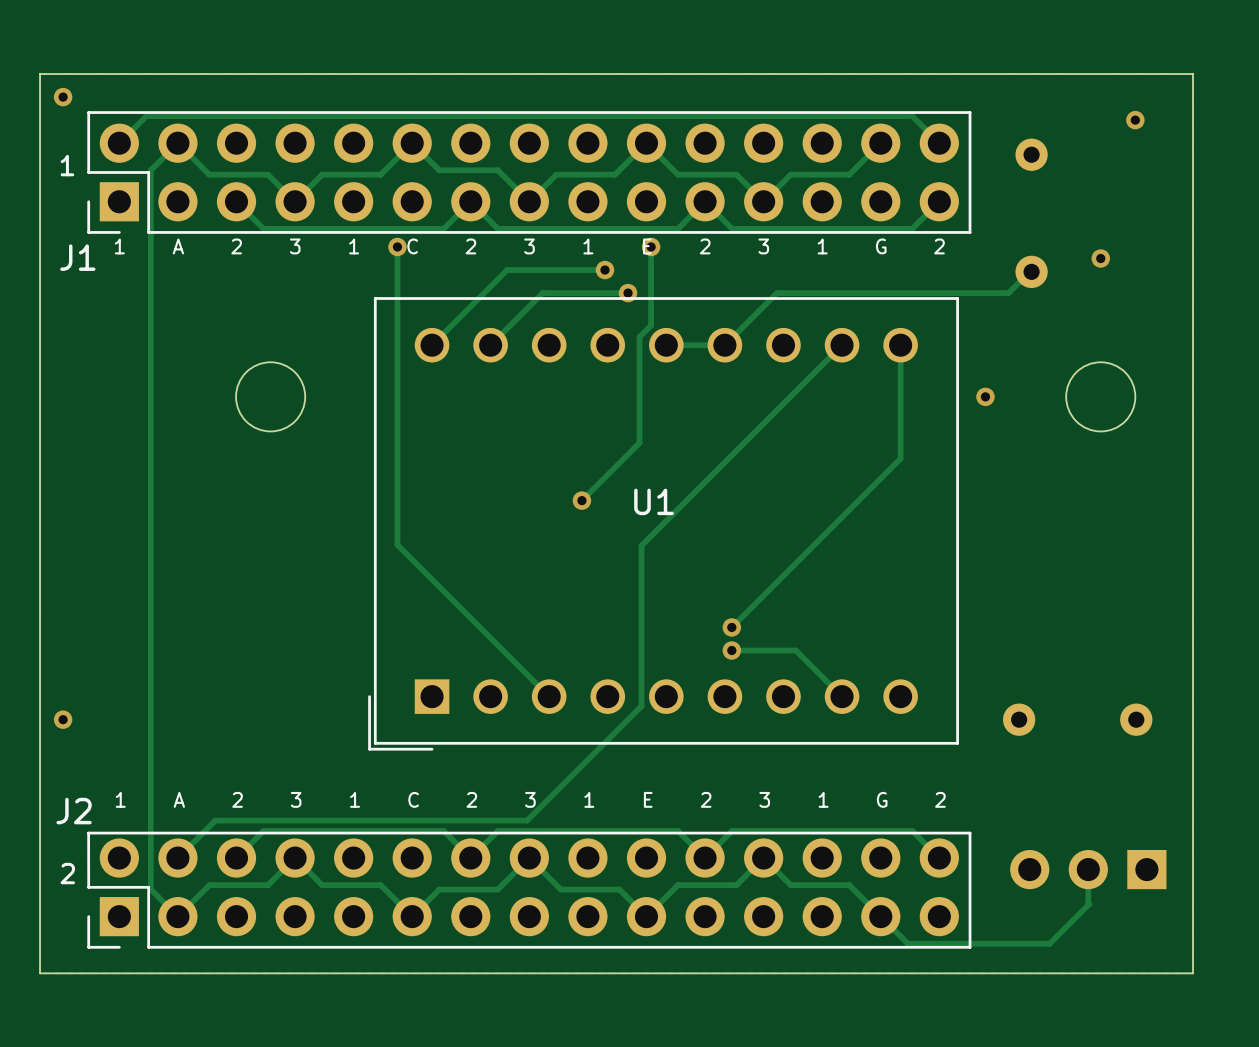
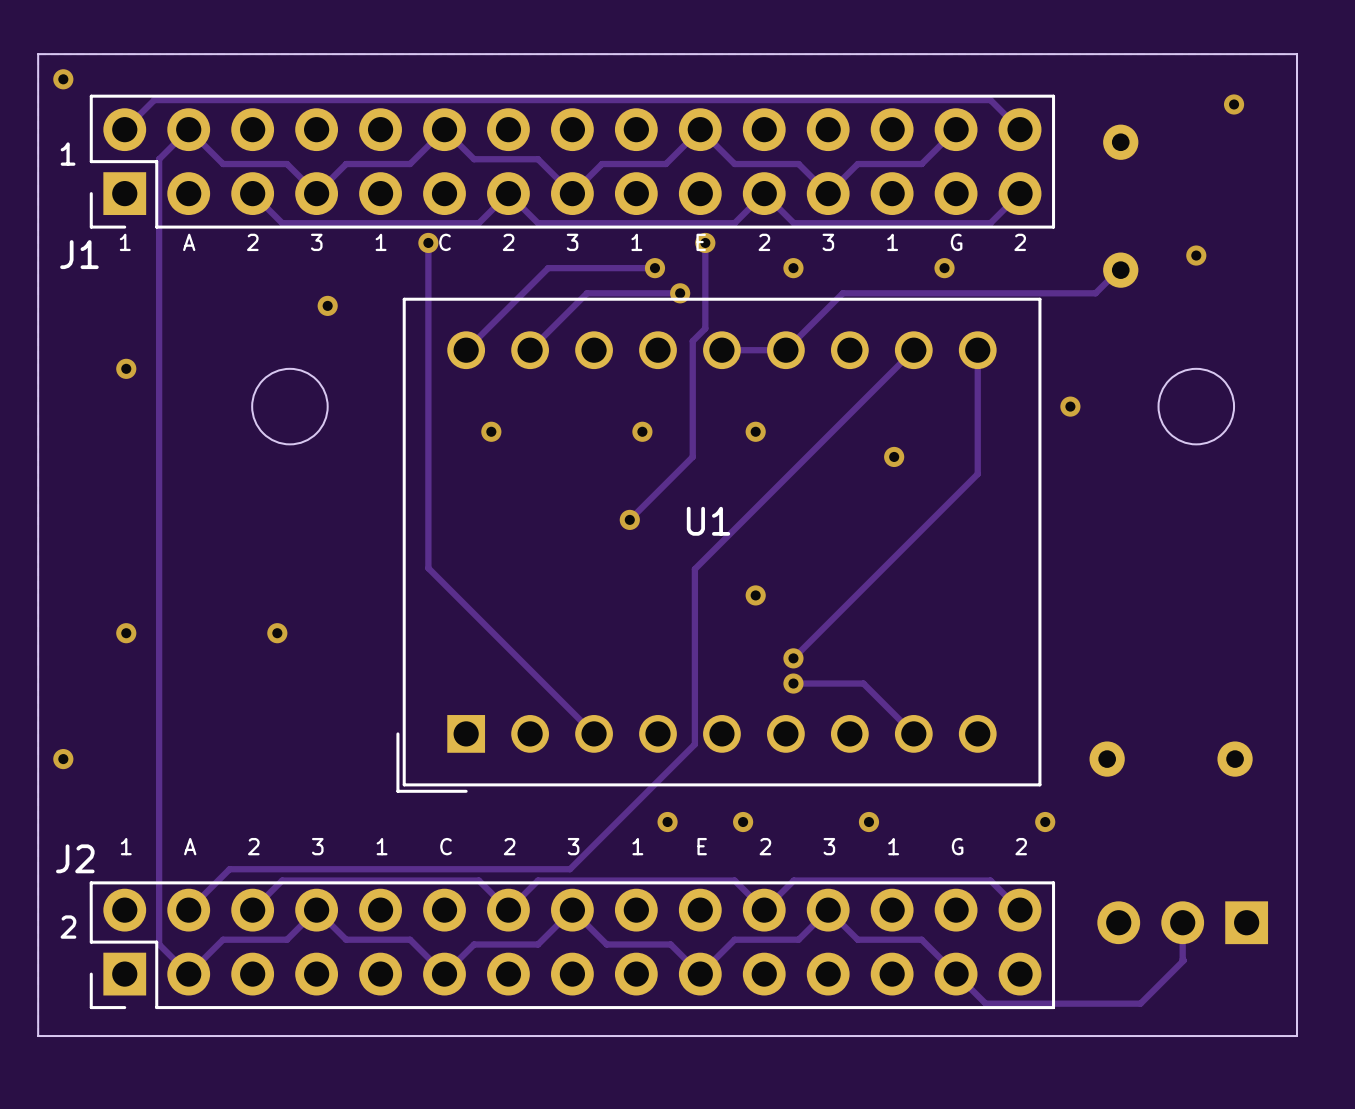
via: none -> (793, 268)
via: none -> (944, 268)
via: none -> (327, 305)
via: none -> (126, 368)
via: none -> (491, 431)
via: none -> (642, 431)
via: none -> (755, 431)
via: none -> (894, 456)
via: none -> (755, 595)
via: none -> (126, 633)
via: none -> (277, 633)
via: none -> (667, 822)
via: none -> (743, 822)
via: none -> (868, 822)
via: none -> (1045, 822)

